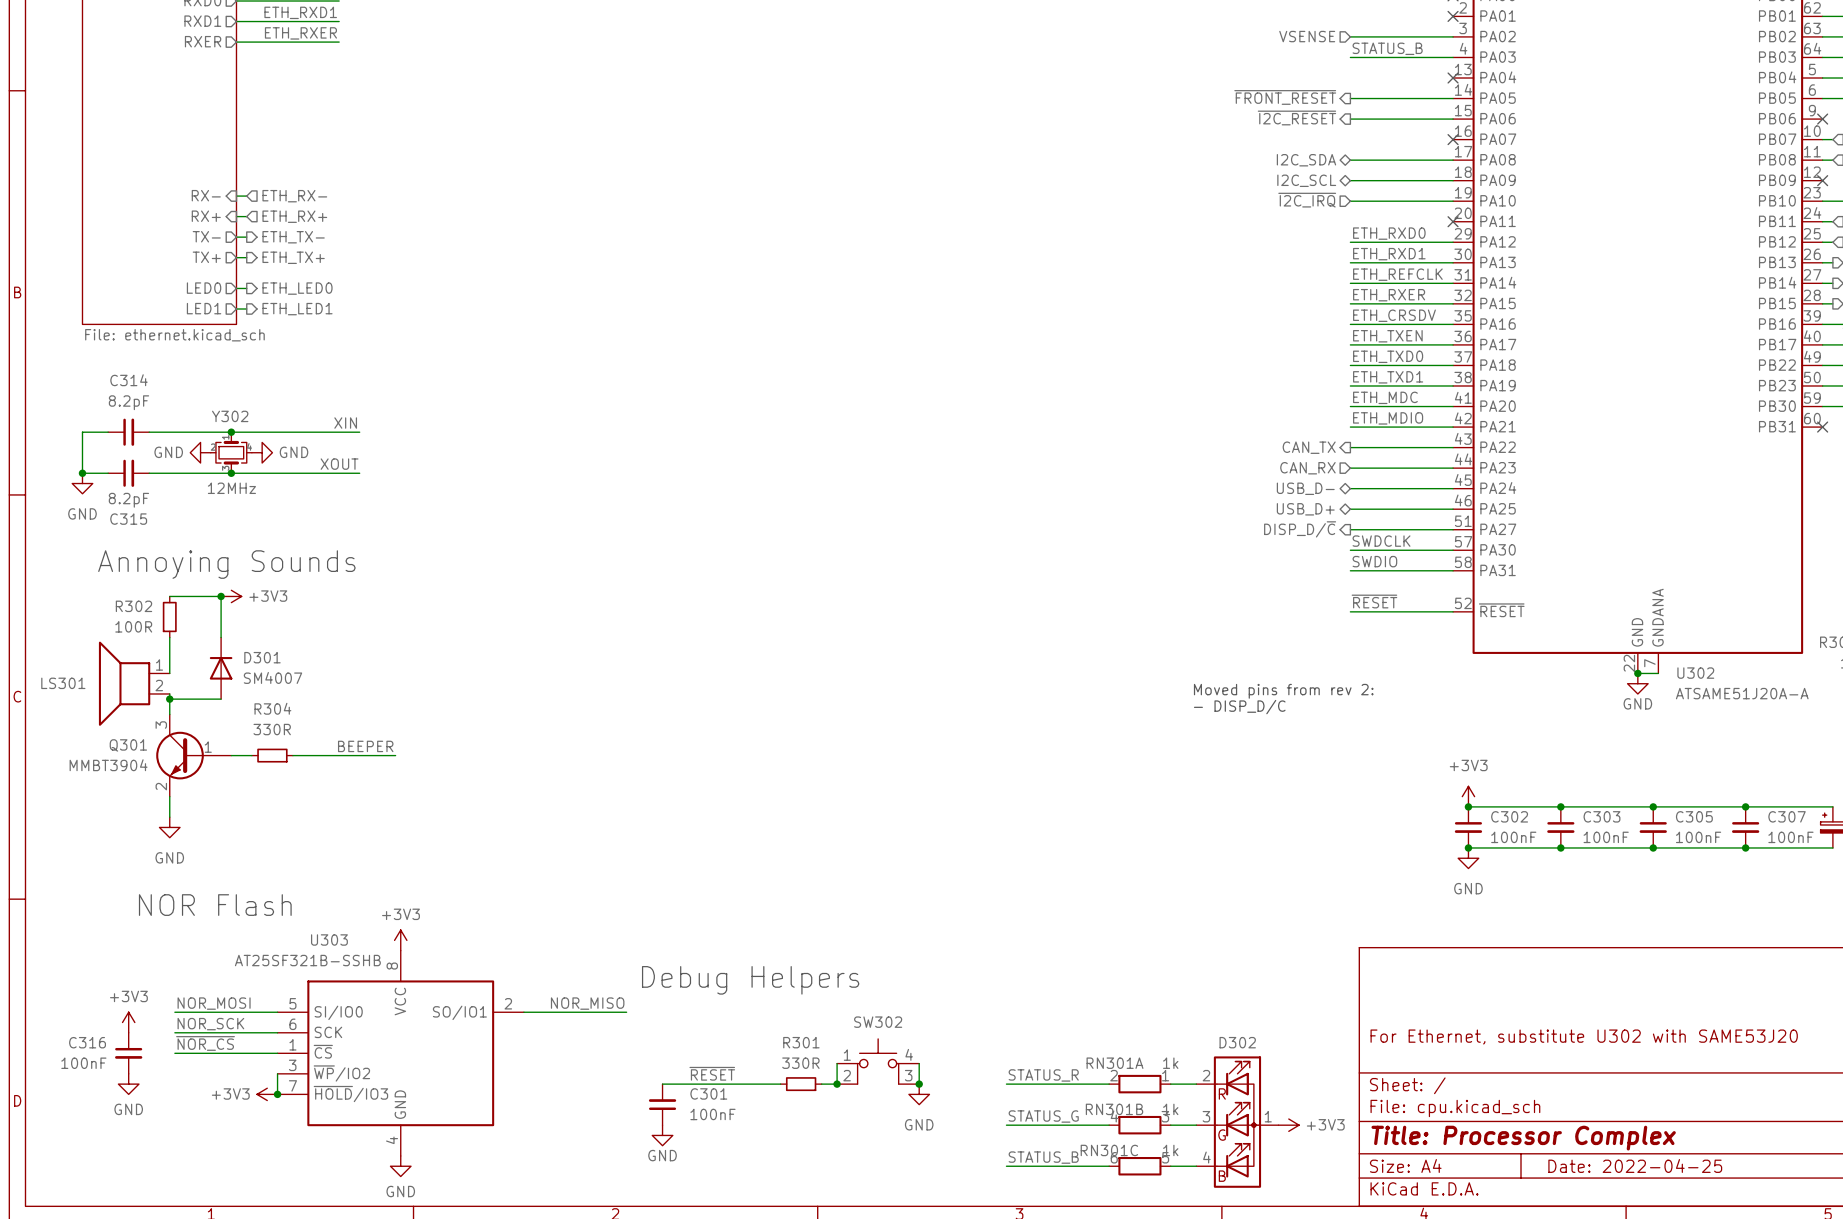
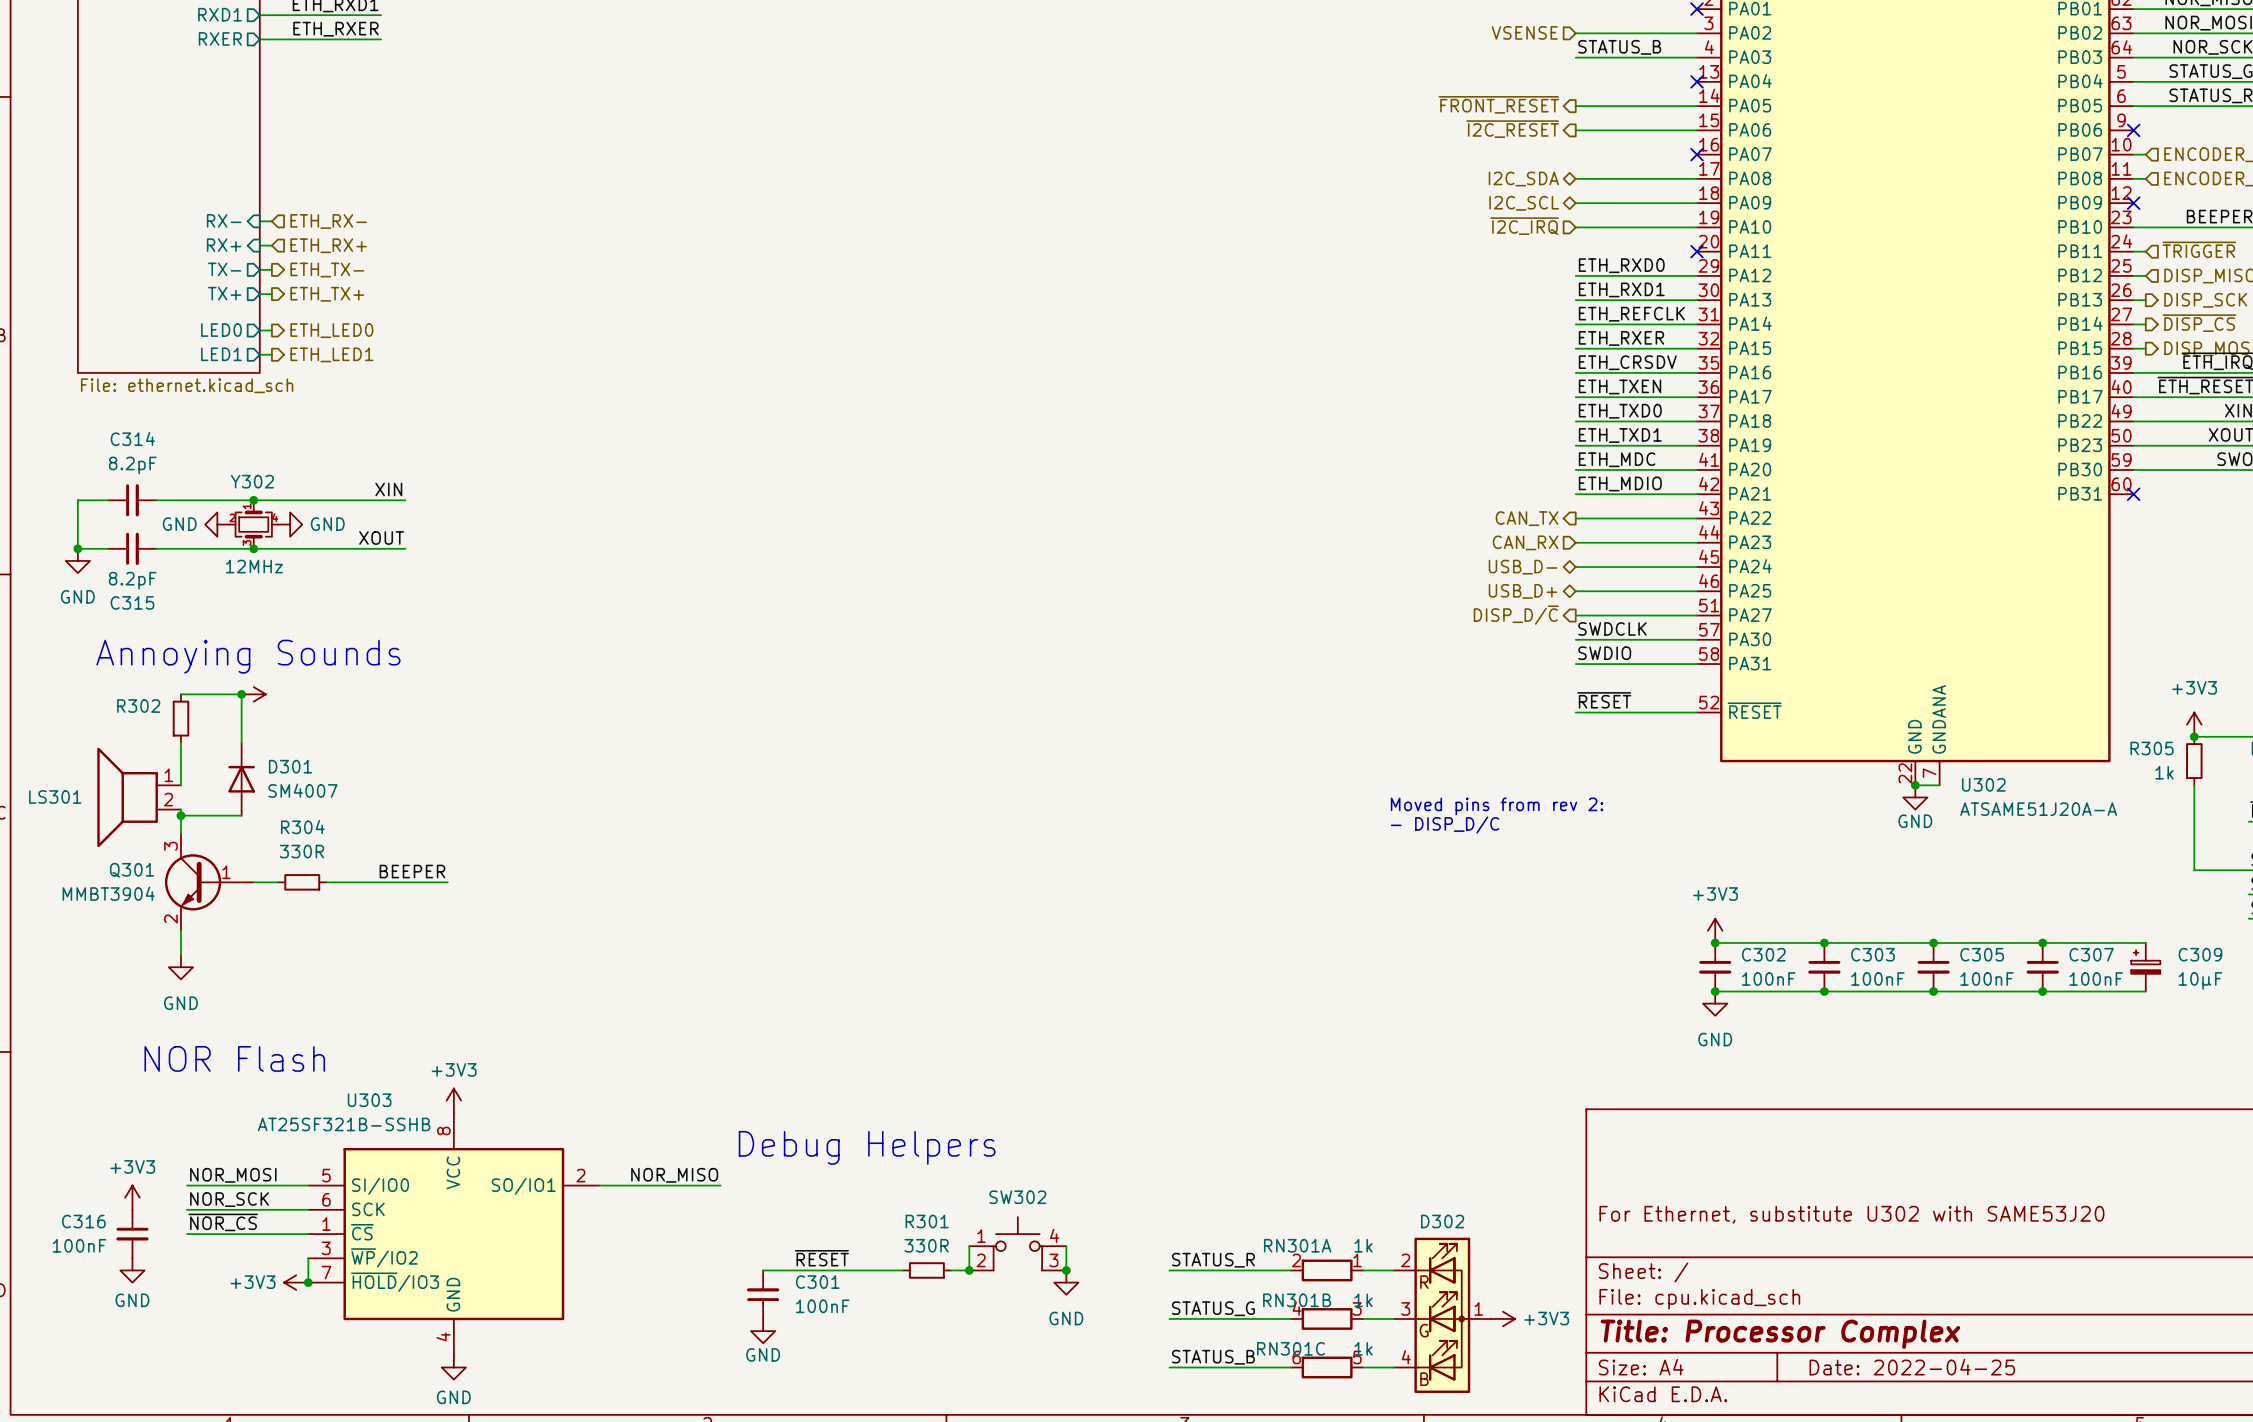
power symbol text: +3V3 (268, 596) -> none
R302 value: 100R (133, 626) -> none

